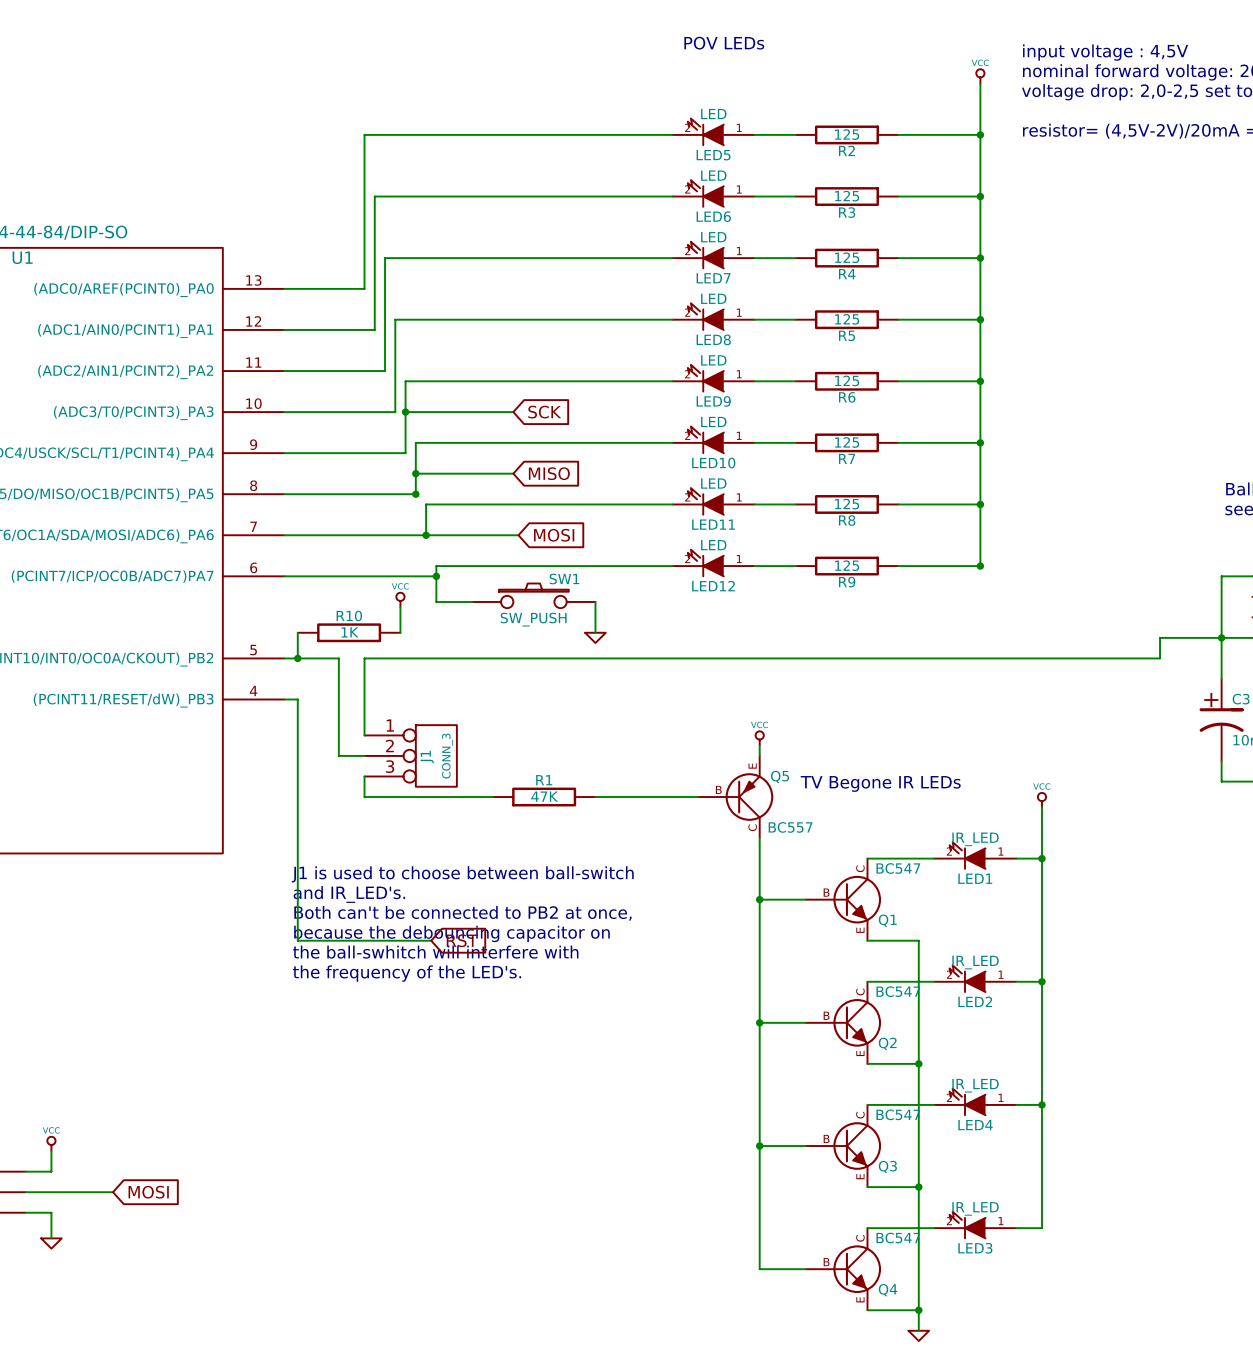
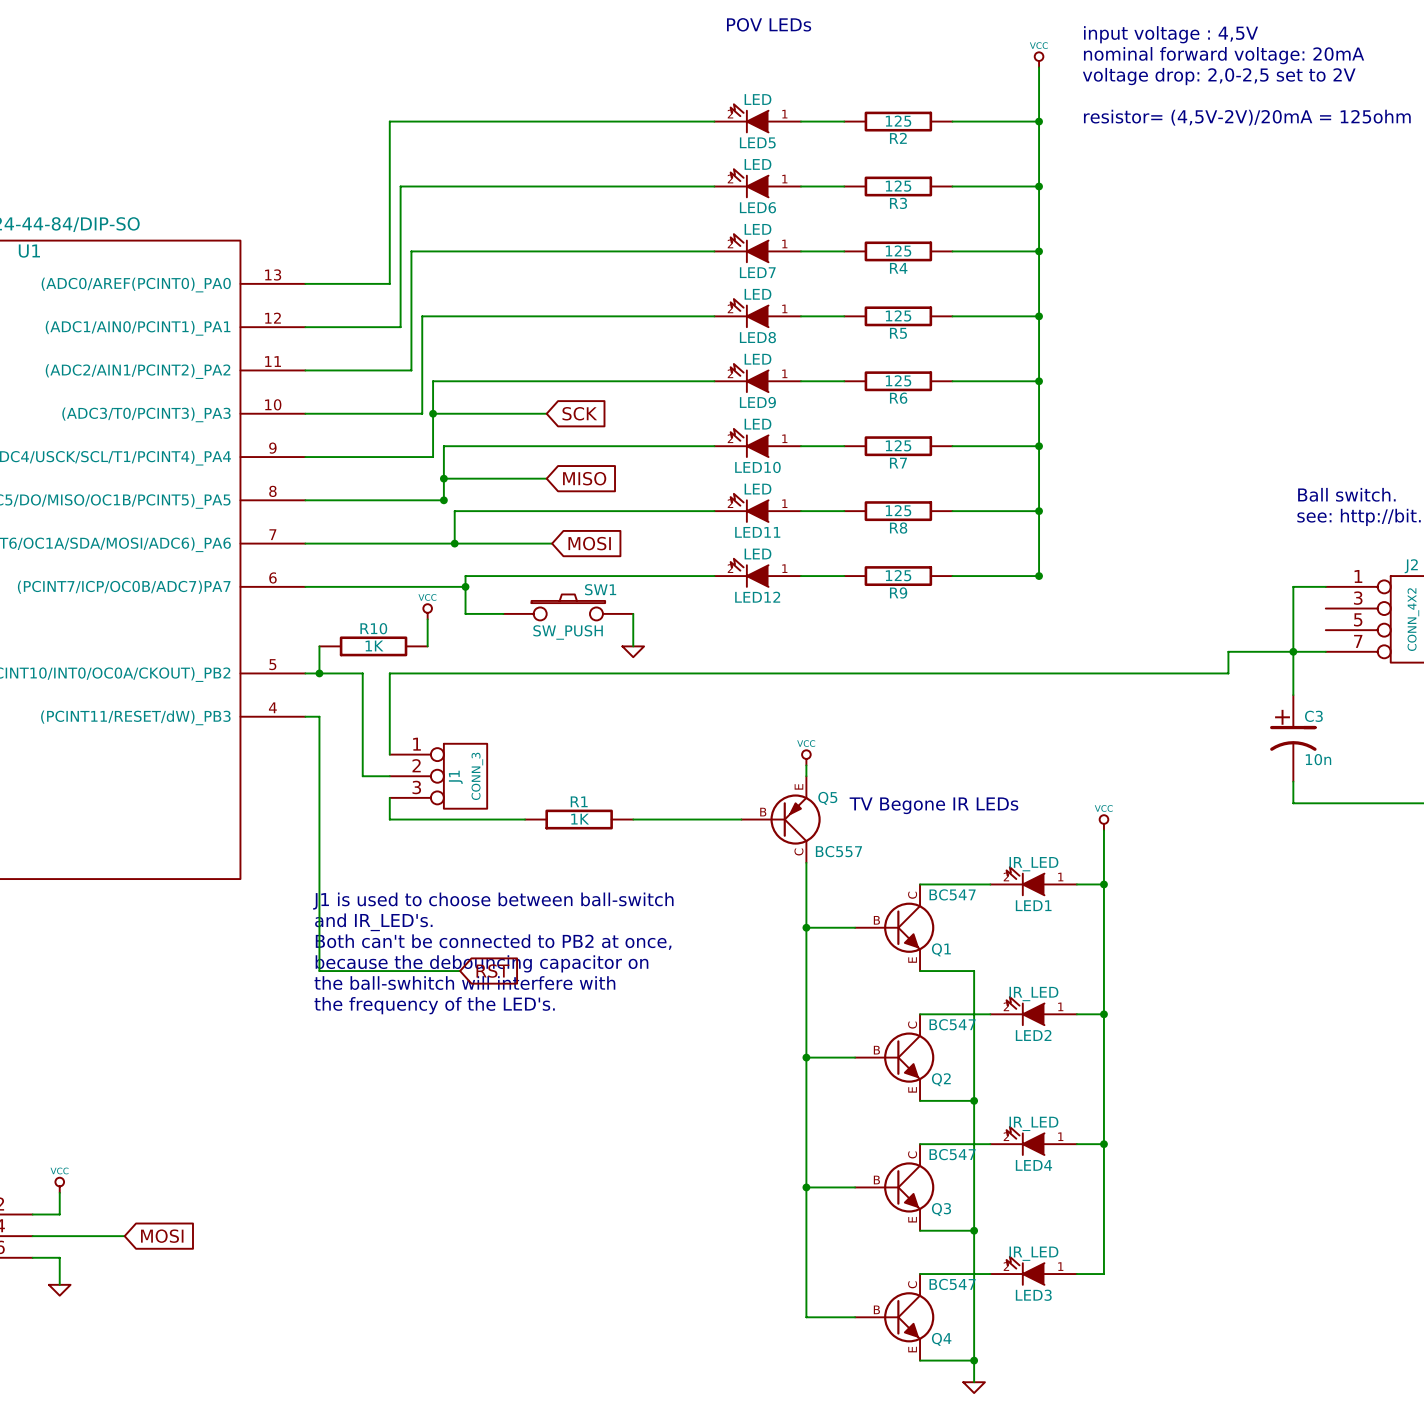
R1 value: 47K (544, 796) -> 1K (580, 819)

